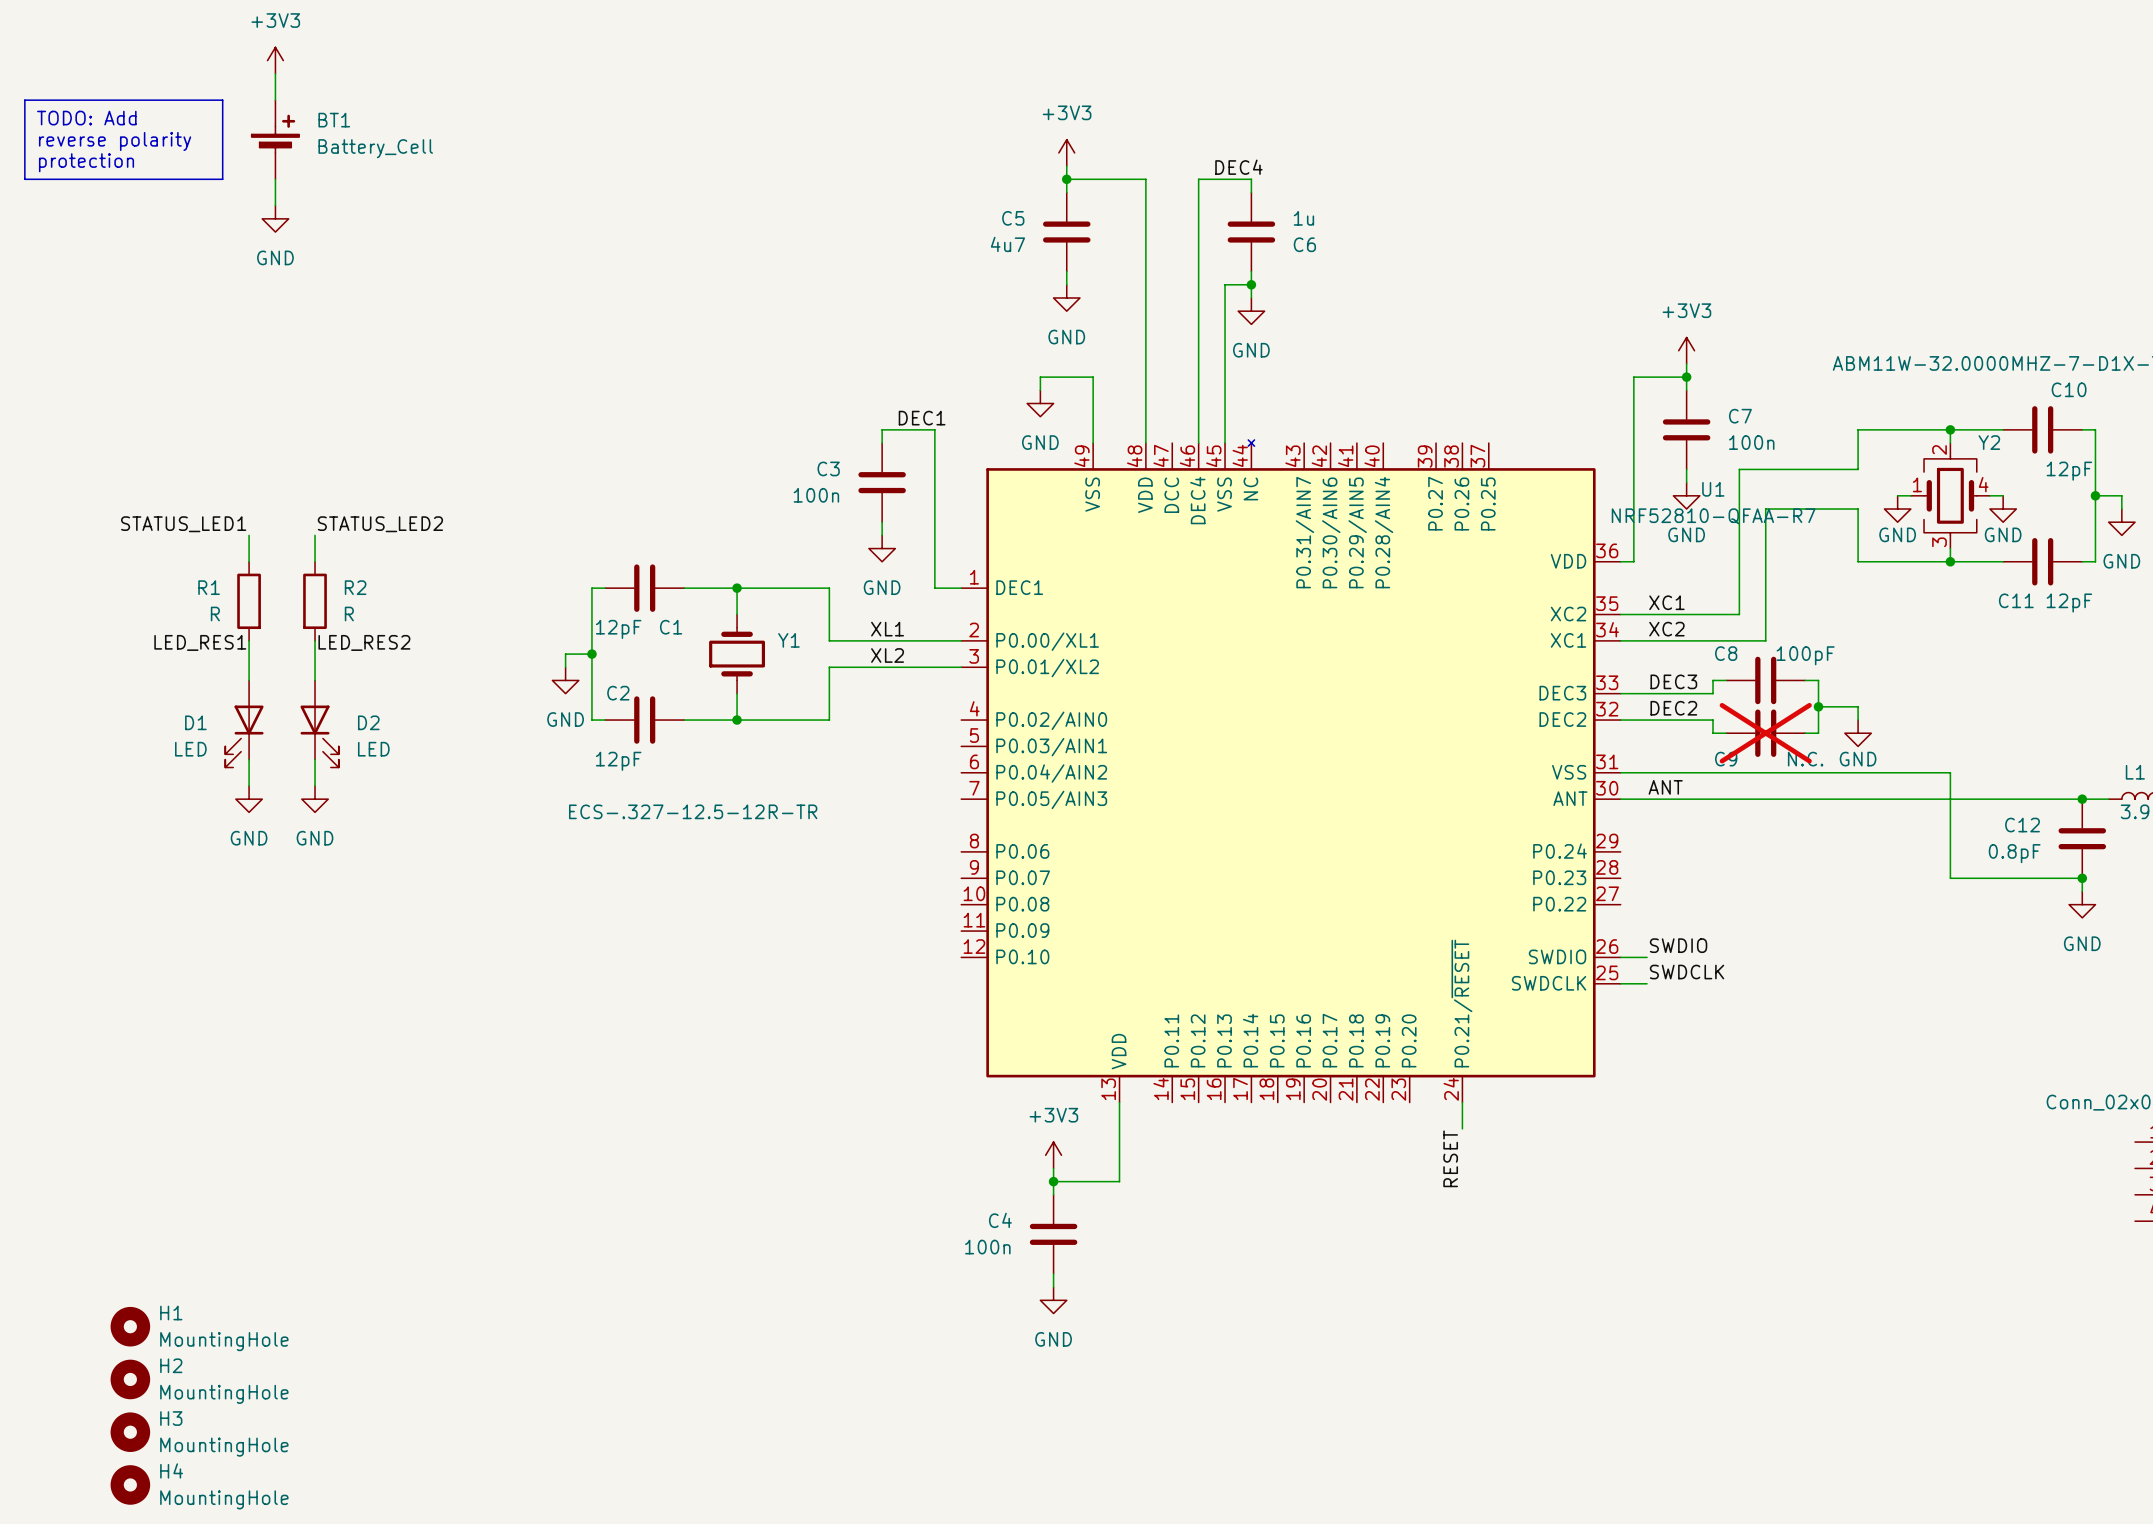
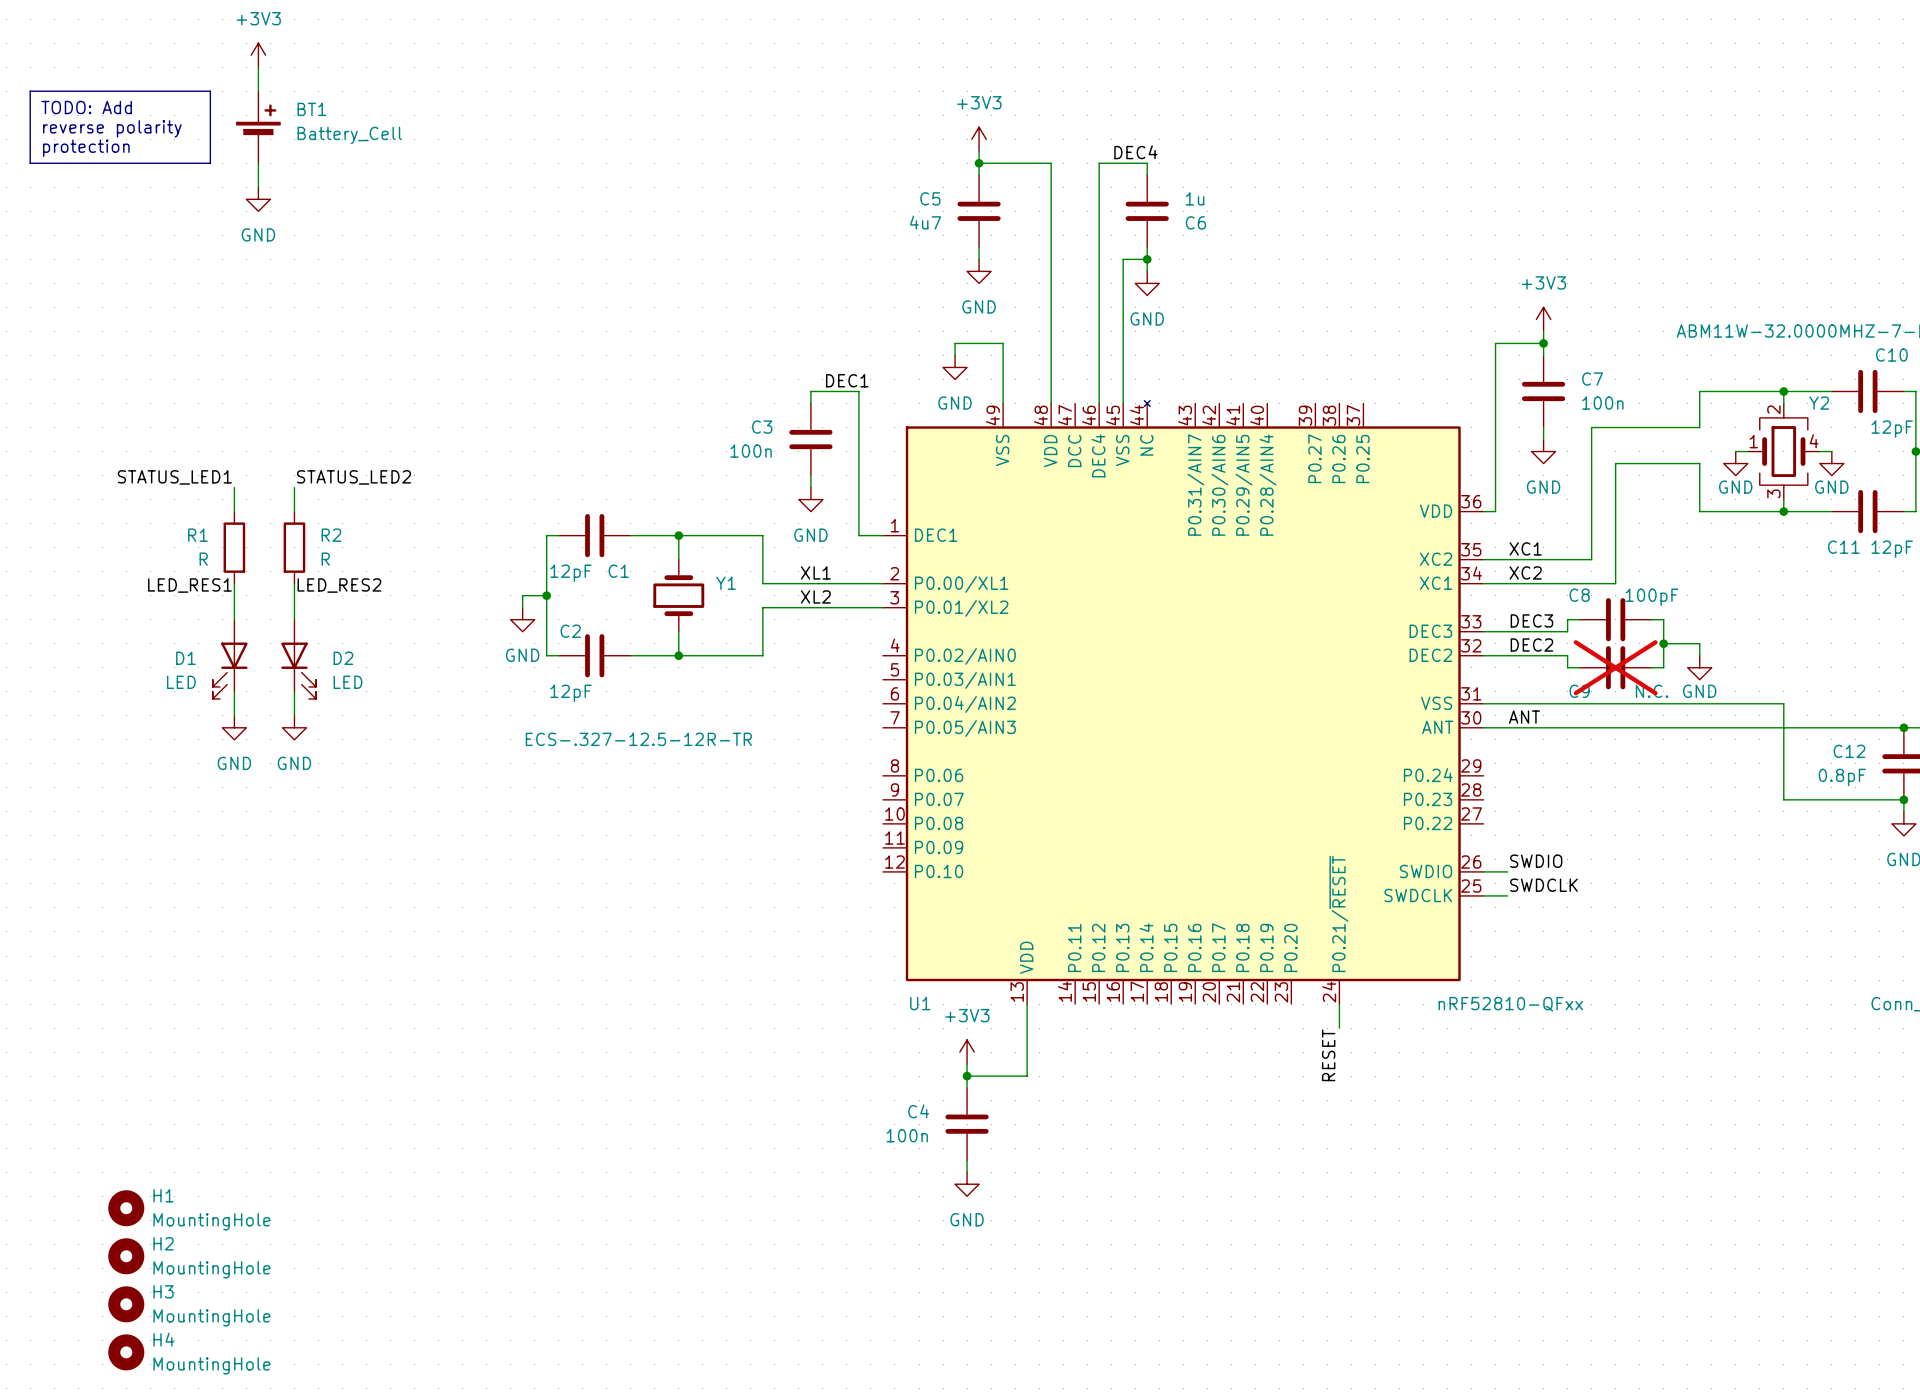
U1 name position: U1 (1713, 489) -> U1 (920, 1003)
U1 value: NRF52810-QFAA-R7 (1713, 516) -> nRF52810-QFxx (1510, 1004)

